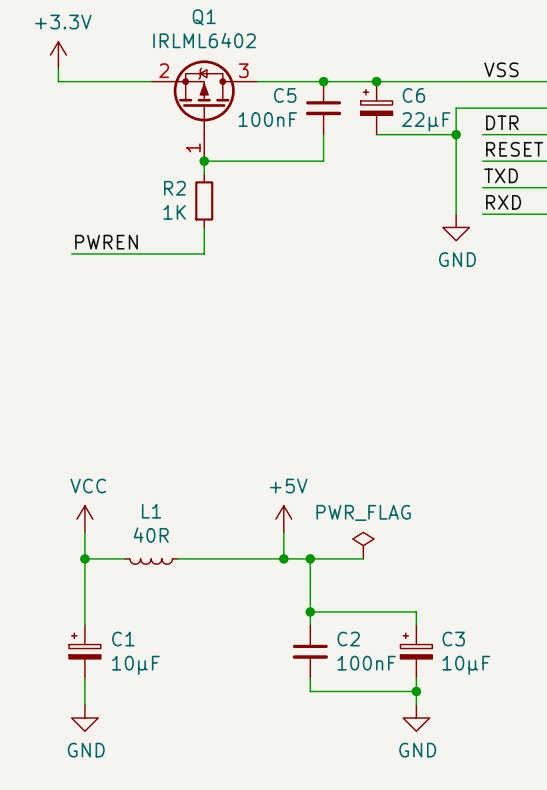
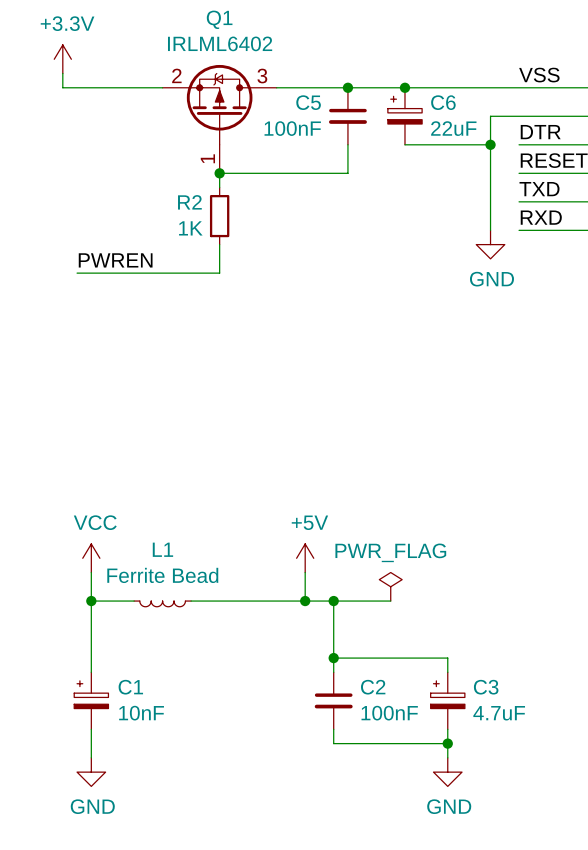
C6 value: 22µF (426, 121) -> 22uF (453, 128)
L1 value: 40R (151, 535) -> Ferrite Bead (162, 575)
C1 value: 10µF (135, 665) -> 10nF (141, 713)
C3 value: 10µF (466, 665) -> 4.7uF (499, 713)

